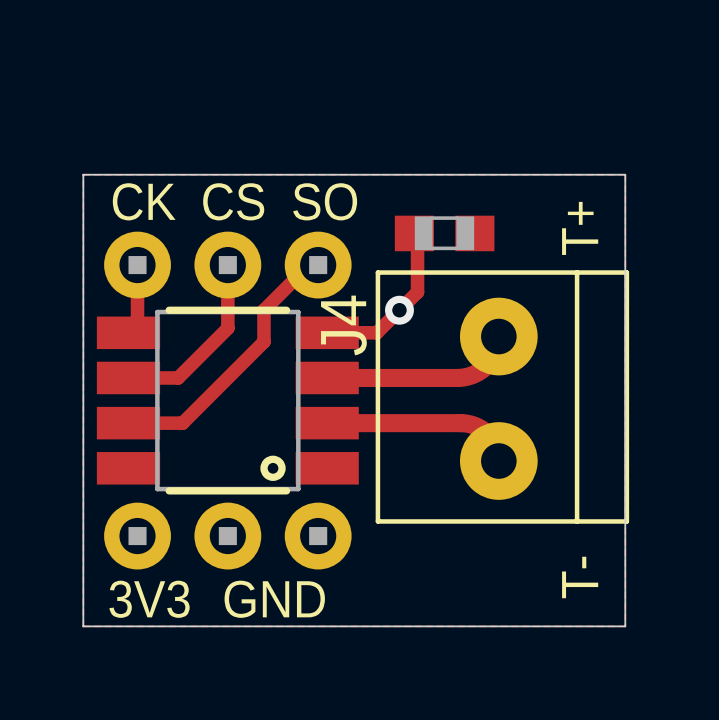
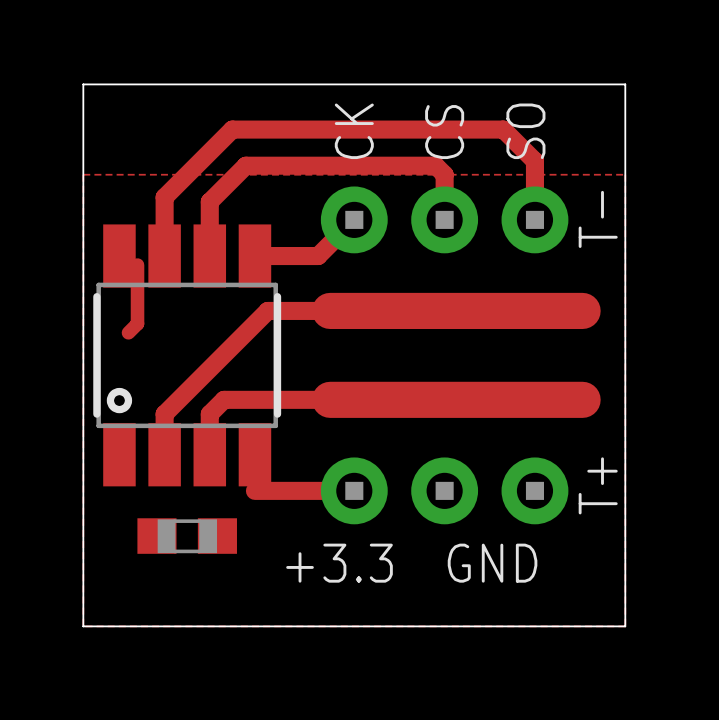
board edge: (83, 174) (625, 174) -> (83, 174) (83, 84) (625, 84) (625, 174)
text rotation: 0° (144, 201) -> 90° counterclockwise (354, 131)
text position: CK (144, 201) -> CK (354, 131)
text rotation: 0° (233, 201) -> 90° counterclockwise (444, 132)
text position: CS (233, 201) -> CS (444, 132)
text rotation: 0° (325, 201) -> 90° counterclockwise (525, 131)
text position: SO (325, 201) -> SO (525, 131)
part footprint: [394, 215, 495, 252] -> [320, 186, 569, 254]
track: none -> (354, 219) (318, 256) (254, 256)
track: none -> (444, 219) (444, 174) (435, 165) (245, 165) (209, 201) (209, 256)
track: none -> (534, 219) (534, 161) (503, 129) (232, 129) (164, 197) (164, 256)
text position: T+ (580, 228) -> T+ (598, 485)
track: (414, 233) (417, 223) (417, 292) (376, 332) (327, 332) -> none
track: (227, 265) (227, 328) (178, 377) (128, 377) -> none
part: (227, 265) -> none
track: (318, 265) (309, 265) (263, 310) (263, 341) (182, 423) (128, 423) -> none
via: (399, 310) -> none
track: none -> (582, 310) (267, 310) (164, 414) (164, 454)
track: (498, 336) (497, 347) (490, 361) (478, 372) (468, 376) (327, 377) -> none
J4: (502, 397) -> none
track: none -> (582, 399) (224, 399) (209, 414) (209, 454)
part rotation: 0° (227, 400) -> 90° clockwise (187, 355)
track: (327, 423) (470, 424) (484, 430) (491, 437) (495, 446) (498, 461) -> none
track: none -> (254, 490) (354, 490)
part: none -> (444, 490)
part: none -> (187, 536)
part: (227, 536) -> none
text: none -> +3.3 (339, 563)
text position: T- (580, 577) -> T- (598, 219)
text: 3V3 (149, 599) -> none
text position: GND (274, 599) -> GND (492, 563)

